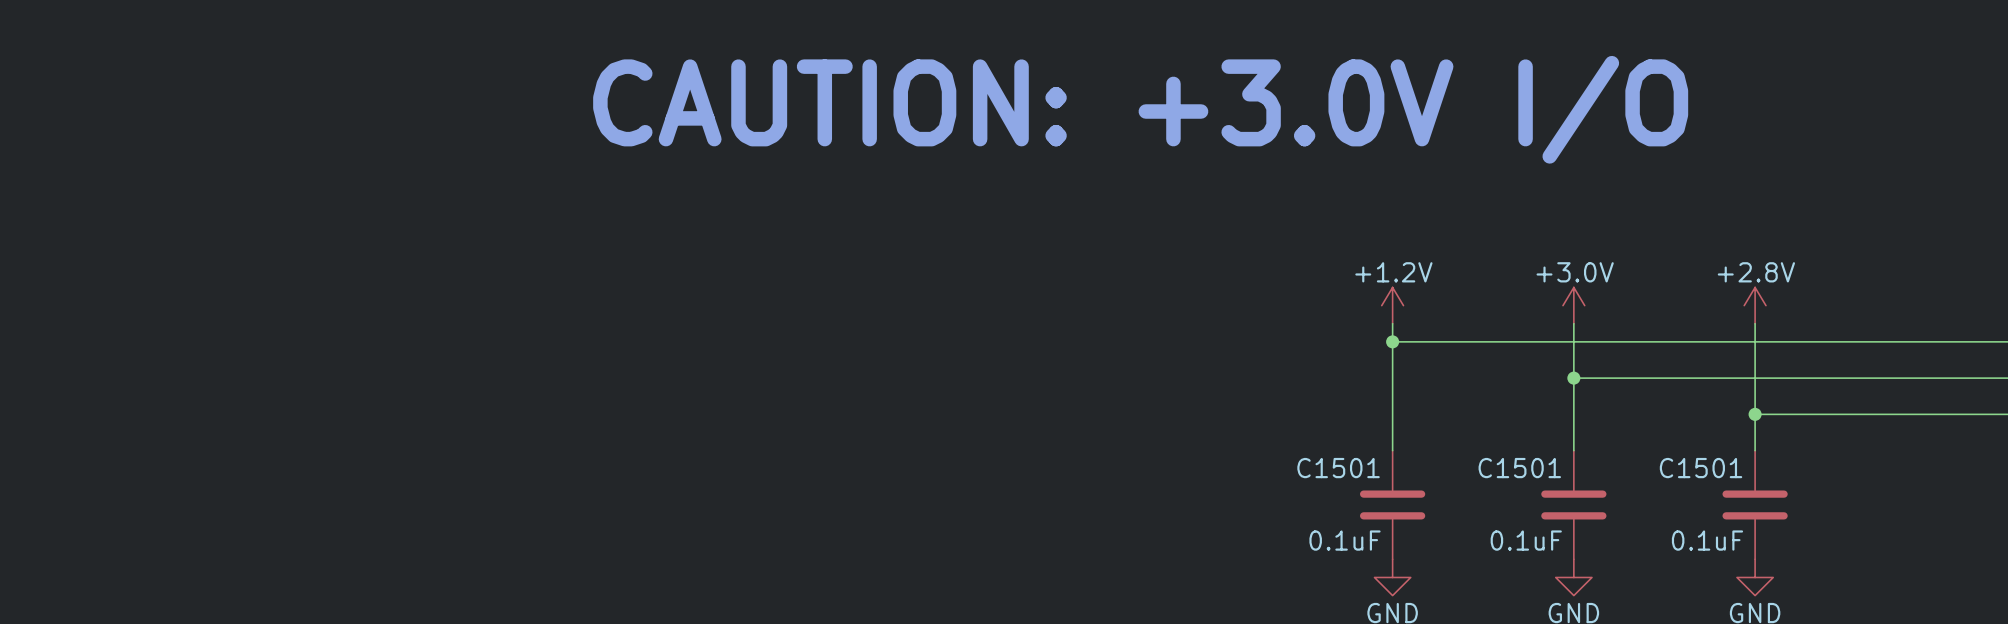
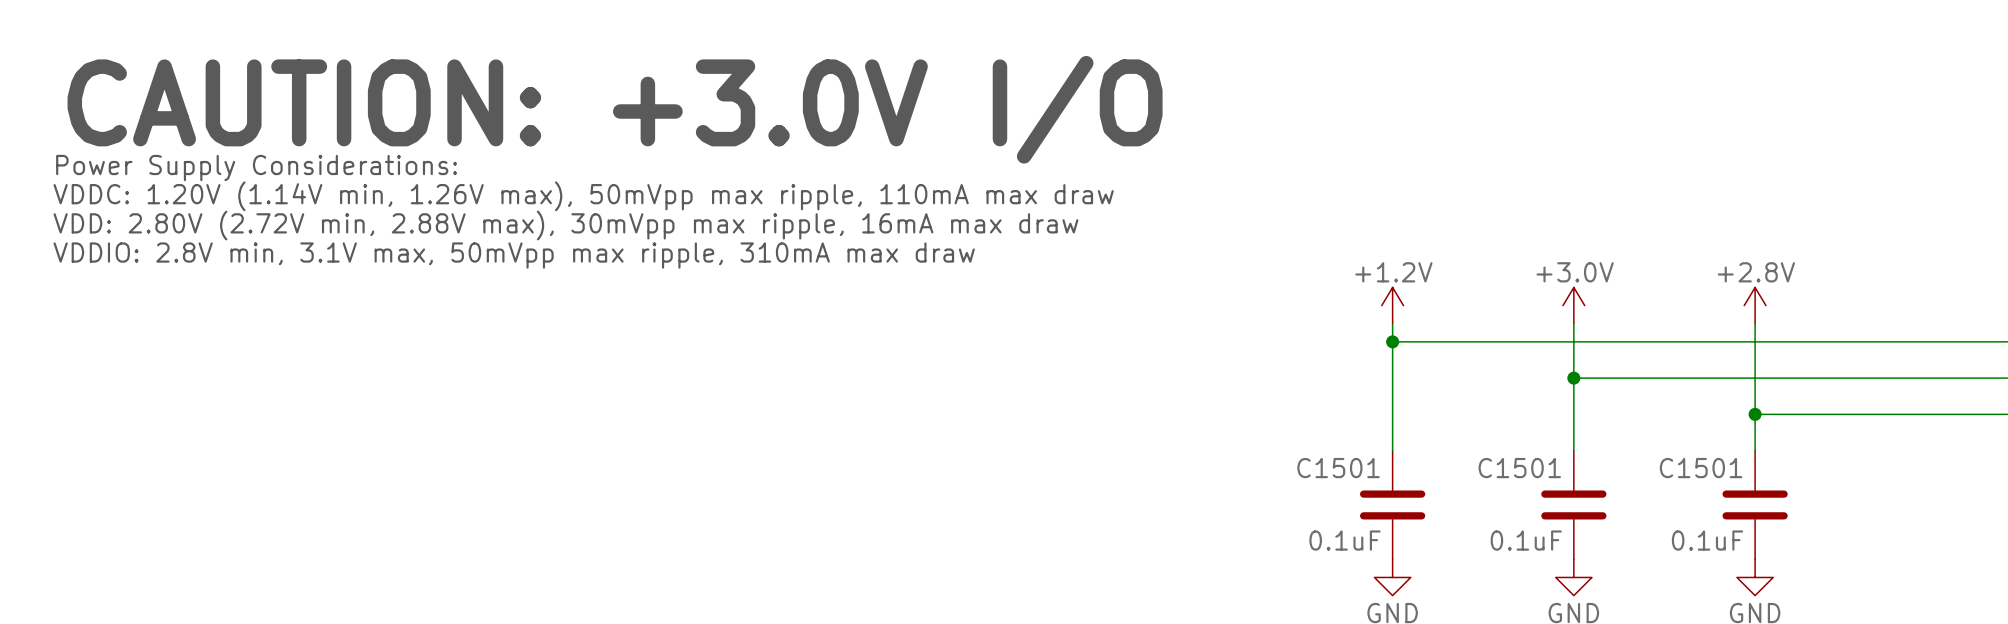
text: none -> CAUTION: +3.0V I/O (615, 109)
text: CAUTION: +3.0V I/O (1140, 109) -> none
text: none -> Power Supply Considerations: (256, 168)
text: none -> VDDC: 1.20V (1.14V min, 1.26V max), 50mVpp max ripple, 110mA max draw (583, 196)
text: none -> VDD: 2.80V (2.72V min, 2.88V max), 30mVpp max ripple, 16mA max draw (565, 225)
text: none -> VDDIO: 2.8V min, 3.1V max, 50mVpp max ripple, 310mA max draw (514, 255)

